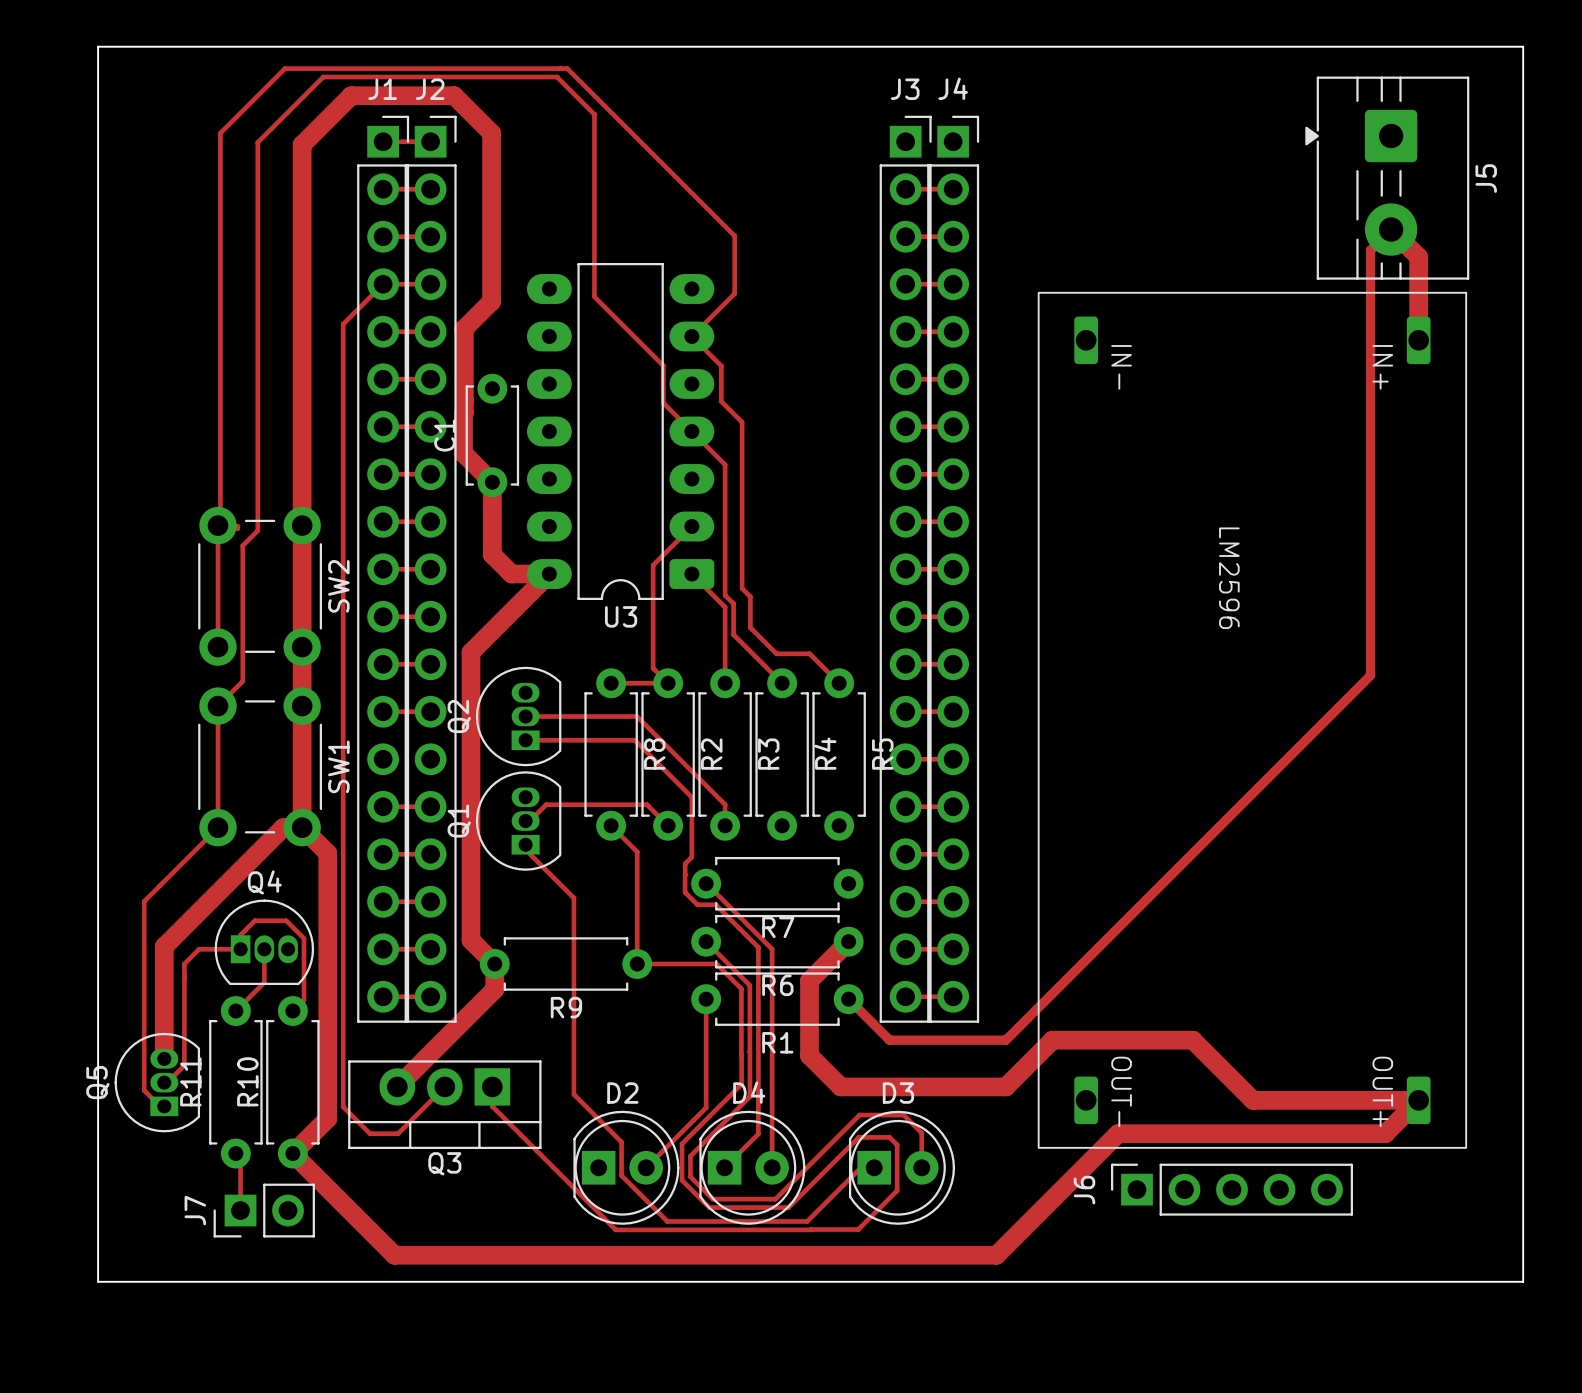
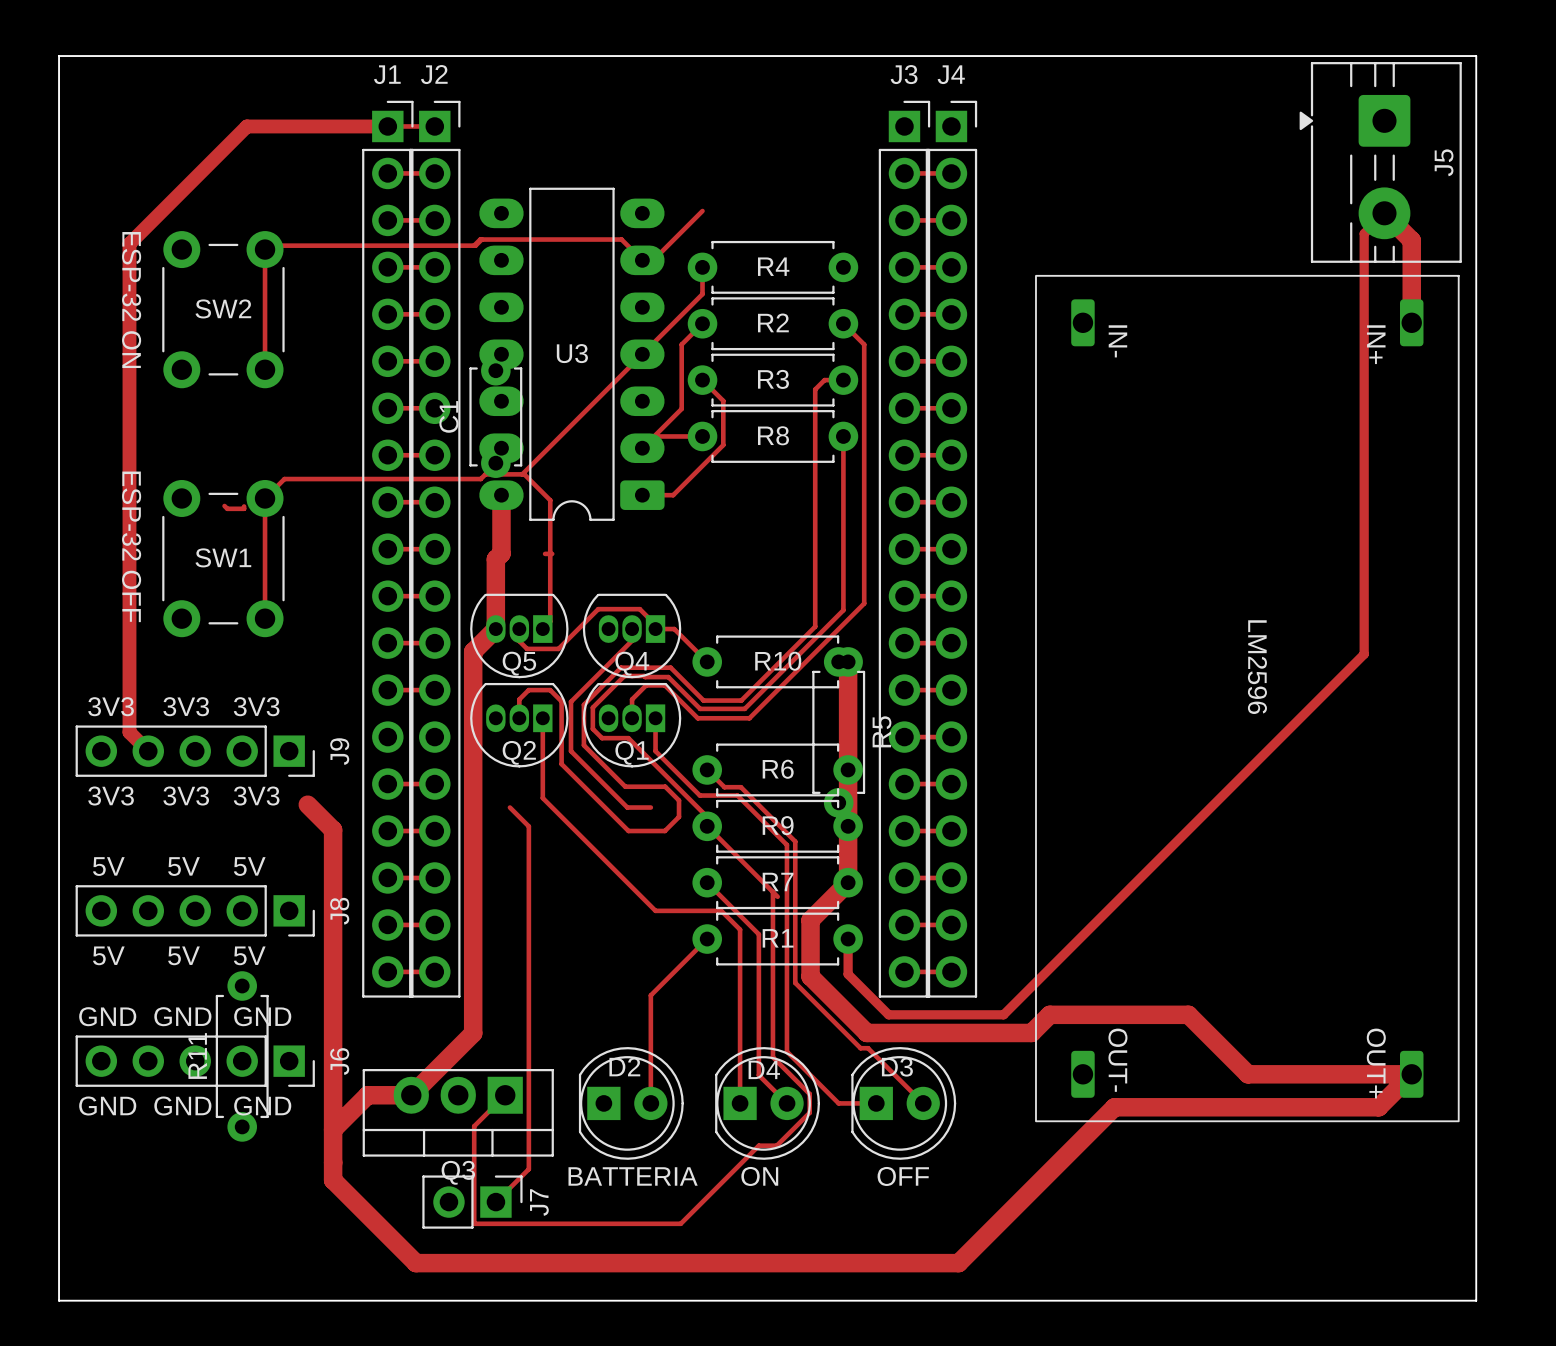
board edge: (98, 46) (1523, 46) (1523, 1281) (98, 1281) (98, 46) -> (59, 56) (59, 1300) (1476, 1300) (1476, 56) (59, 56)
track: none -> (387, 126) (246, 126) (129, 243) (129, 732) (148, 751)
J5 name position: J5 (1486, 178) -> J5 (1444, 162)
track: none -> (702, 211) (653, 260) (642, 260) (621, 239) (480, 239) (474, 245)
track: none -> (481, 239) (475, 245) (268, 245) (265, 249) (265, 369)
track: (383, 284) (343, 324) (343, 1106) (370, 1133) (398, 1133) (444, 1086) -> none
track: none -> (702, 267) (702, 294) (522, 474)
text: none -> ESP-32 ON (131, 300)
track: none -> (702, 323) (681, 344) (681, 408) (642, 448)
track: none -> (843, 323) (864, 344) (864, 603) (749, 718) (697, 718) (664, 685) (646, 685) (632, 699) (632, 718)
track: none -> (702, 380) (723, 400) (723, 445) (673, 495) (642, 495)
track: none -> (843, 380) (824, 380) (815, 389) (815, 626) (741, 700) (703, 700) (670, 667) (621, 667) (583, 704) (583, 745) (625, 786) (665, 786) (679, 800) (679, 816) (664, 831) (628, 831) (561, 764) (561, 701) (550, 690) (528, 690) (519, 699) (519, 718)
U3 position: (620, 431) -> (571, 354)
track: none -> (654, 436) (702, 436)
track: none -> (843, 436) (843, 610) (744, 708) (700, 708) (668, 677) (644, 676) (624, 676) (592, 707) (592, 728) (602, 738) (628, 738) (707, 816) (707, 826) (777, 896)
track: none -> (500, 496) (501, 553) (495, 559) (495, 629) (473, 651) (473, 1033) (411, 1095) (367, 1095) (333, 1129)
track: (691, 526) (653, 565) (653, 668) (668, 683) (611, 683) -> none
track: (691, 574) (725, 607) (725, 683) -> none
LM2596 name position: LM2596 (1229, 578) -> LM2596 (1257, 667)
text: none -> ESP-32 OFF (131, 546)
SW2 position: (260, 586) -> (223, 309)
SW2 name rotation: 0° (338, 586) -> 90° clockwise (223, 308)
SW2 name position: SW2 (338, 586) -> SW2 (223, 308)
U3 name position: U3 (621, 616) -> U3 (572, 353)
track: none -> (265, 618) (265, 498) (284, 479) (480, 479) (485, 474) (524, 474) (550, 500) (550, 621) (542, 629)
track: (218, 647) (218, 525) (220, 523) (220, 133) (284, 68) (567, 68) (734, 235) (734, 293) (691, 336) (721, 365) (721, 401) (742, 422) (742, 588) (750, 596) (750, 627) (776, 653) (809, 653) (839, 683) -> none
track: none -> (519, 629) (519, 641) (527, 648) (558, 648) (598, 609) (639, 609) (655, 624) (655, 629) (674, 629) (707, 661)
track: none -> (632, 629) (632, 640) (570, 701) (570, 751) (627, 807) (650, 807)
track: (782, 683) (733, 634) (733, 603) (725, 595) (725, 464) (663, 402) (663, 365) (594, 296) (594, 114) (557, 77) (323, 77) (257, 142) (257, 530) (242, 545) (242, 681) (218, 706) -> none
track: (218, 706) (218, 827) (144, 901) (144, 1090) (160, 1106) (164, 1106) -> none
Q2 rotation: 0° (518, 716) -> 90° counterclockwise (519, 725)
track: (525, 716) (637, 716) (725, 804) (725, 825) -> none
text: none -> 3V3 (111, 706)
text: none -> 3V3 (186, 706)
text: none -> 3V3 (256, 706)
track: (525, 740) (634, 740) (691, 797) (691, 857) (685, 863) (685, 892) (697, 904) (715, 904) (758, 947) (758, 958) -> (707, 882) (758, 934)
track: none -> (542, 718) (542, 798) (655, 910) (721, 910) (740, 929) (740, 1103)
track: none -> (655, 718) (655, 751) (699, 795) (737, 795) (786, 845) (786, 1051) (838, 1103) (876, 1103)
R4 name position: R4 (825, 753) -> R4 (773, 266)
R8 rotation: 0° (611, 754) -> 90° clockwise (772, 436)
R8 position: (611, 754) -> (772, 436)
R8 name position: R8 (654, 754) -> R8 (773, 435)
R2 rotation: 0° (668, 754) -> 90° clockwise (772, 323)
R2 position: (668, 754) -> (772, 323)
R2 name position: R2 (711, 754) -> R2 (773, 322)
R3 rotation: 0° (725, 754) -> 90° clockwise (772, 380)
R3 position: (725, 754) -> (772, 380)
R3 name position: R3 (768, 754) -> R3 (773, 379)
R4 rotation: 0° (782, 754) -> 90° clockwise (772, 267)
R4 position: (782, 754) -> (772, 267)
SW1 position: (260, 766) -> (223, 558)
SW1 name rotation: 0° (338, 766) -> 90° clockwise (223, 557)
SW1 name position: SW1 (338, 766) -> SW1 (223, 557)
J9: none -> (195, 751)
track: none -> (707, 769) (724, 787) (740, 787) (795, 841) (795, 982) (860, 1048) (868, 1048) (923, 1103)
text: none -> 3V3 (111, 796)
text: none -> 3V3 (186, 796)
text: none -> 3V3 (256, 796)
Q1 rotation: 0° (518, 821) -> 90° counterclockwise (632, 725)
Q1 position: (518, 821) -> (632, 725)
track: (530, 825) (525, 821) (529, 821) (546, 804) (647, 804) (668, 825) -> none
track: (611, 825) (637, 851) (637, 961) -> none
track: (302, 827) (283, 827) (164, 946) (164, 1058) -> none
track: (302, 827) (302, 144) (351, 95) (454, 95) (491, 133) (491, 301) (463, 329) (463, 453) (492, 482) (492, 554) (511, 574) (549, 574) (471, 652) (471, 940) (494, 964) (494, 989) (397, 1086) -> none
track: (525, 849) (573, 898) (573, 1094) (621, 1142) (621, 1175) (667, 1221) (807, 1221) (860, 1167) (874, 1167) -> (528, 826) (528, 1169) (495, 1202)
track: (706, 883) (772, 949) (772, 1167) -> none
R7 position: (777, 883) -> (777, 882)
text: none -> 5V (108, 866)
text: none -> 5V (183, 866)
text: none -> 5V (249, 866)
track: none -> (772, 892) (772, 1057) (809, 1094) (809, 1112) (776, 1145) (758, 1145) (680, 1223) (474, 1223) (474, 1126) (505, 1095)
R7 name position: R7 (778, 927) -> R7 (778, 881)
J8: none -> (195, 910)
track: (706, 941) (749, 985) (749, 1051) -> none
R6 position: (777, 941) -> (777, 769)
track: (848, 941) (809, 980) (809, 1055) (840, 1086) (1005, 1086) (1034, 1058) -> (848, 661) (848, 882) (810, 920) (810, 976) (866, 1032) (1031, 1032)
Q4 rotation: 0° (264, 942) -> 180° (632, 635)
Q4 position: (264, 942) -> (632, 635)
track: (264, 949) (264, 982) (235, 1011) -> none
track: none -> (707, 939) (650, 995) (650, 1103)
track: none -> (848, 939) (848, 974)
R9 position: (566, 964) -> (777, 826)
track: (637, 964) (716, 964) (741, 988) (741, 1055) -> none
text: none -> 5V (108, 955)
text: none -> 5V (183, 955)
text: none -> 5V (249, 955)
R6 name position: R6 (777, 985) -> R6 (778, 769)
track: (706, 999) (706, 1107) (646, 1167) -> none
R1 position: (777, 999) -> (777, 939)
R9 name position: R9 (566, 1007) -> R9 (778, 825)
track: (292, 1011) (304, 999) (304, 938) (286, 920) (254, 920) (240, 935) (240, 949) (199, 949) (184, 963) (184, 1065) (167, 1082) (164, 1082) -> none
text: none -> GND (107, 1016)
text: none -> GND (182, 1016)
text: none -> GND (262, 1016)
R1 name position: R1 (777, 1042) -> R1 (778, 938)
track: (749, 1051) (749, 1096) (690, 1156) (690, 1176) (712, 1199) (775, 1199) (859, 1115) (903, 1115) (921, 1133) (921, 1167) -> none
track: (741, 1055) (741, 1084) (682, 1143) (682, 1180) (709, 1207) (788, 1207) (858, 1137) (889, 1137) (897, 1144) (897, 1190) (858, 1229) (615, 1229) (492, 1106) (492, 1086) -> none
R10 name position: R10 (247, 1081) -> R10 (778, 661)
Q5 rotation: 0° (157, 1082) -> 90° counterclockwise (519, 635)
Q5 position: (157, 1082) -> (519, 635)
R10 rotation: 0° (292, 1082) -> 90° clockwise (777, 661)
R10 position: (292, 1082) -> (777, 661)
D4 name position: D4 (749, 1092) -> D4 (764, 1069)
track: (758, 1101) (758, 1134) (724, 1167) -> (758, 1075) (787, 1103)
Q3 position: (444, 1104) -> (458, 1112)
track: (327, 1118) (292, 1153) (394, 1255) (996, 1255) -> (333, 1092) (333, 1180) (416, 1263) (958, 1263) (994, 1227)
text: none -> GND (107, 1106)
text: none -> GND (182, 1106)
text: none -> GND (262, 1106)
track: (235, 1153) (235, 1158) (240, 1162) (240, 1210) -> none
D2 position: (626, 1167) -> (631, 1103)
D4 position: (752, 1167) -> (767, 1103)
D3 position: (902, 1167) -> (903, 1103)
J6 rotation: 0° (1231, 1189) -> 180° (195, 1061)
J6 position: (1231, 1189) -> (195, 1061)
text: none -> BATTERIA (633, 1176)
text: none -> ON (759, 1176)
text: none -> OFF (903, 1176)
J7 rotation: 0° (264, 1210) -> 180° (472, 1202)
J7 position: (264, 1210) -> (472, 1202)

